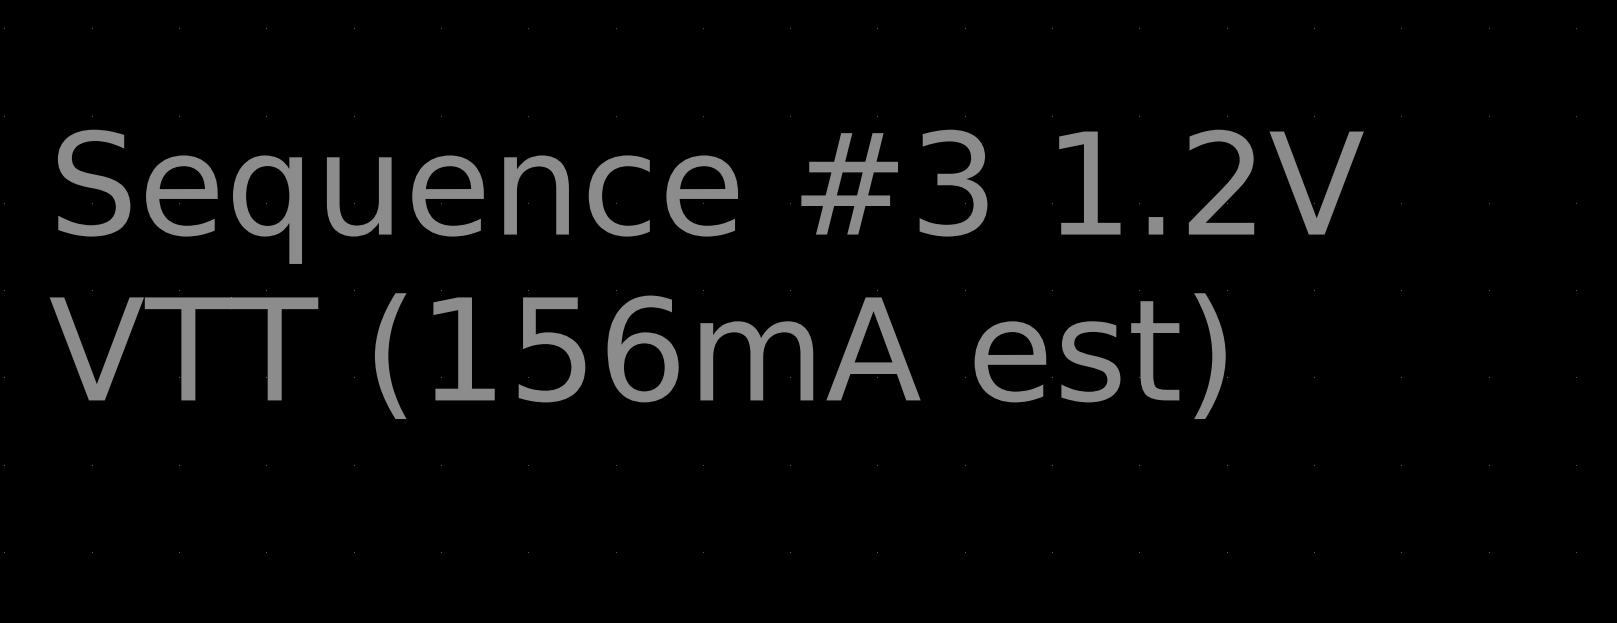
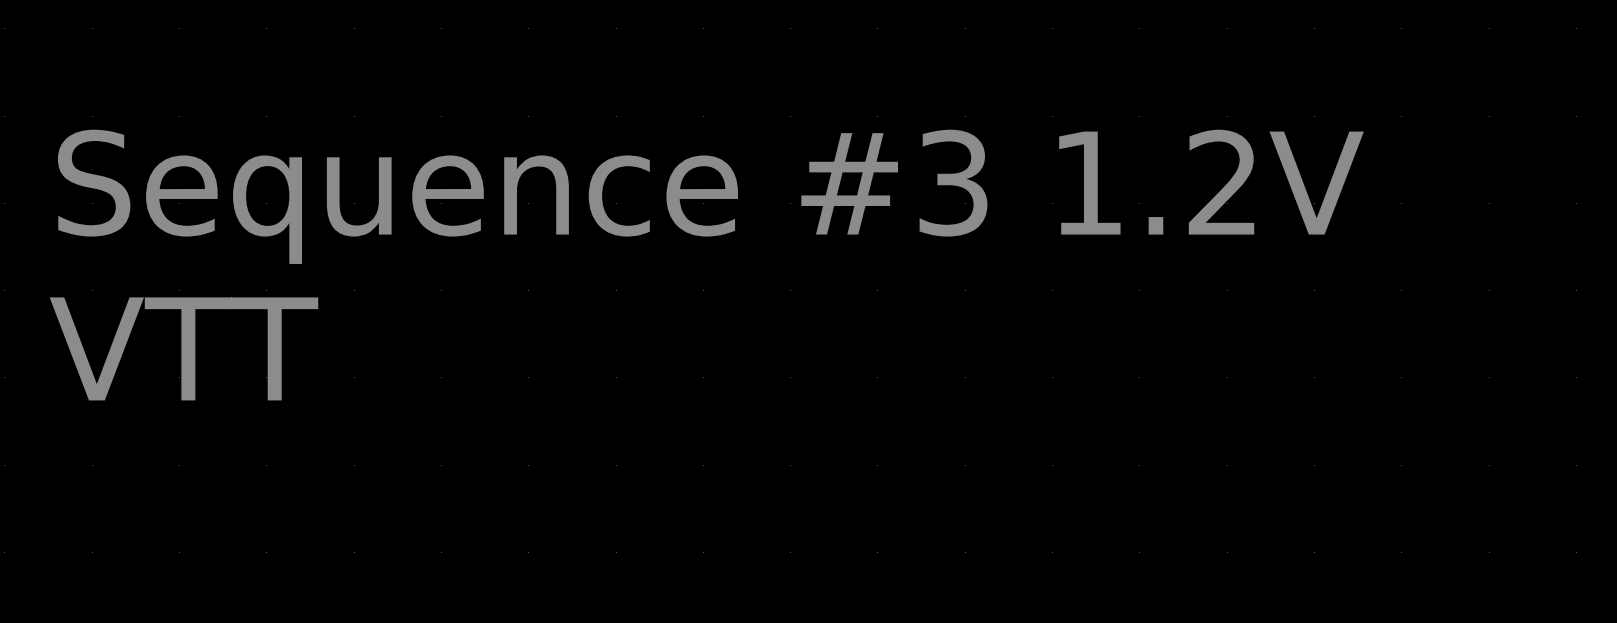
text: VTT (156mA est) (637, 356) -> VTT (183, 348)

